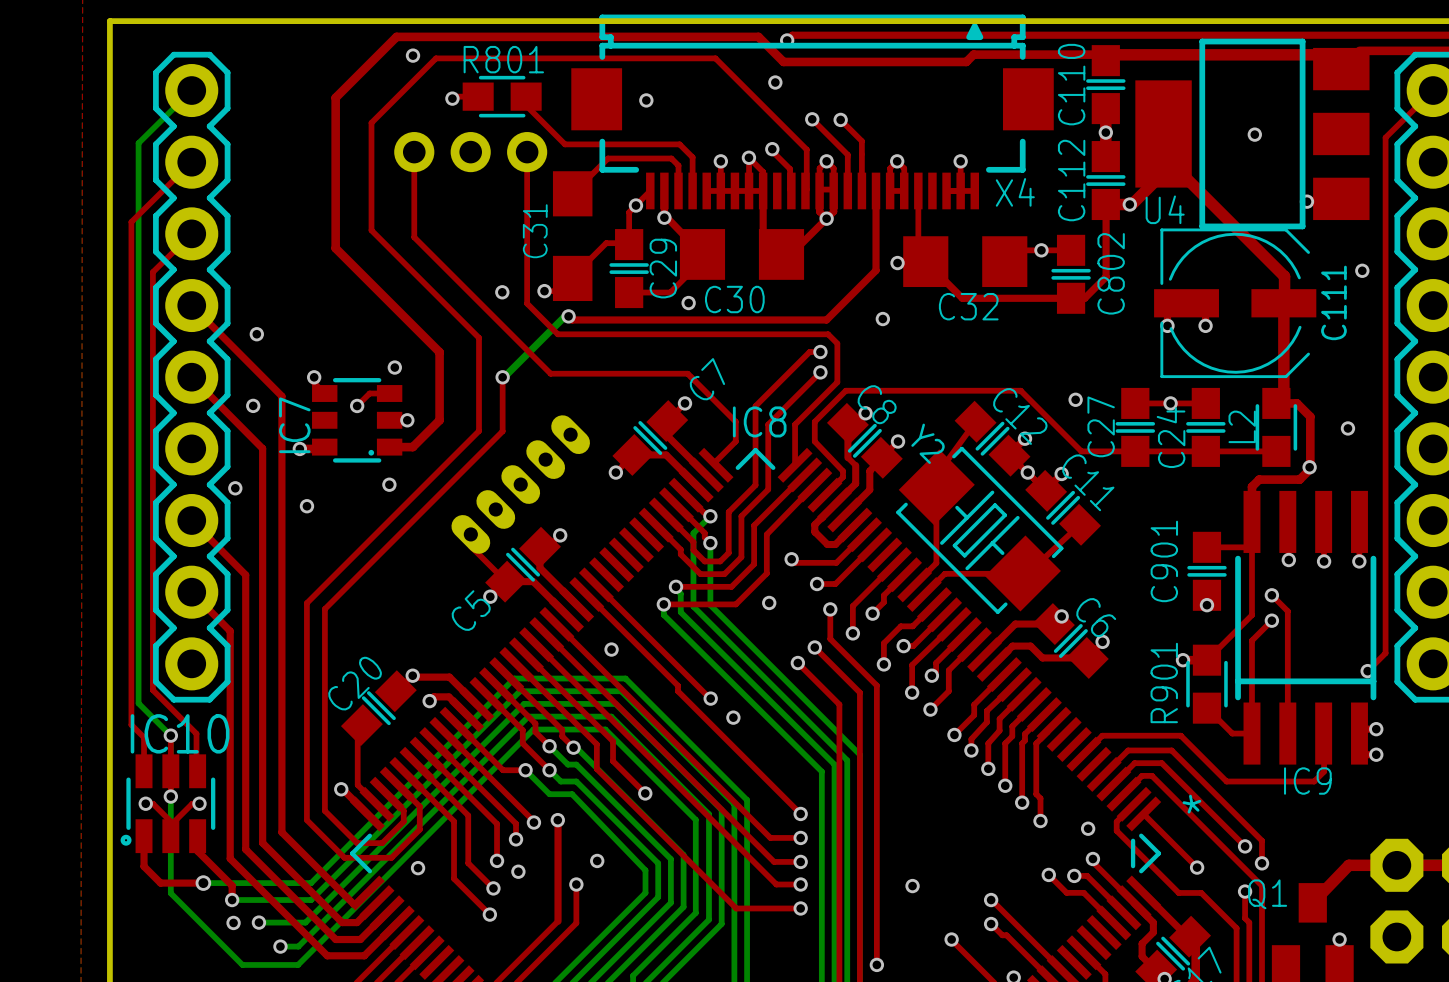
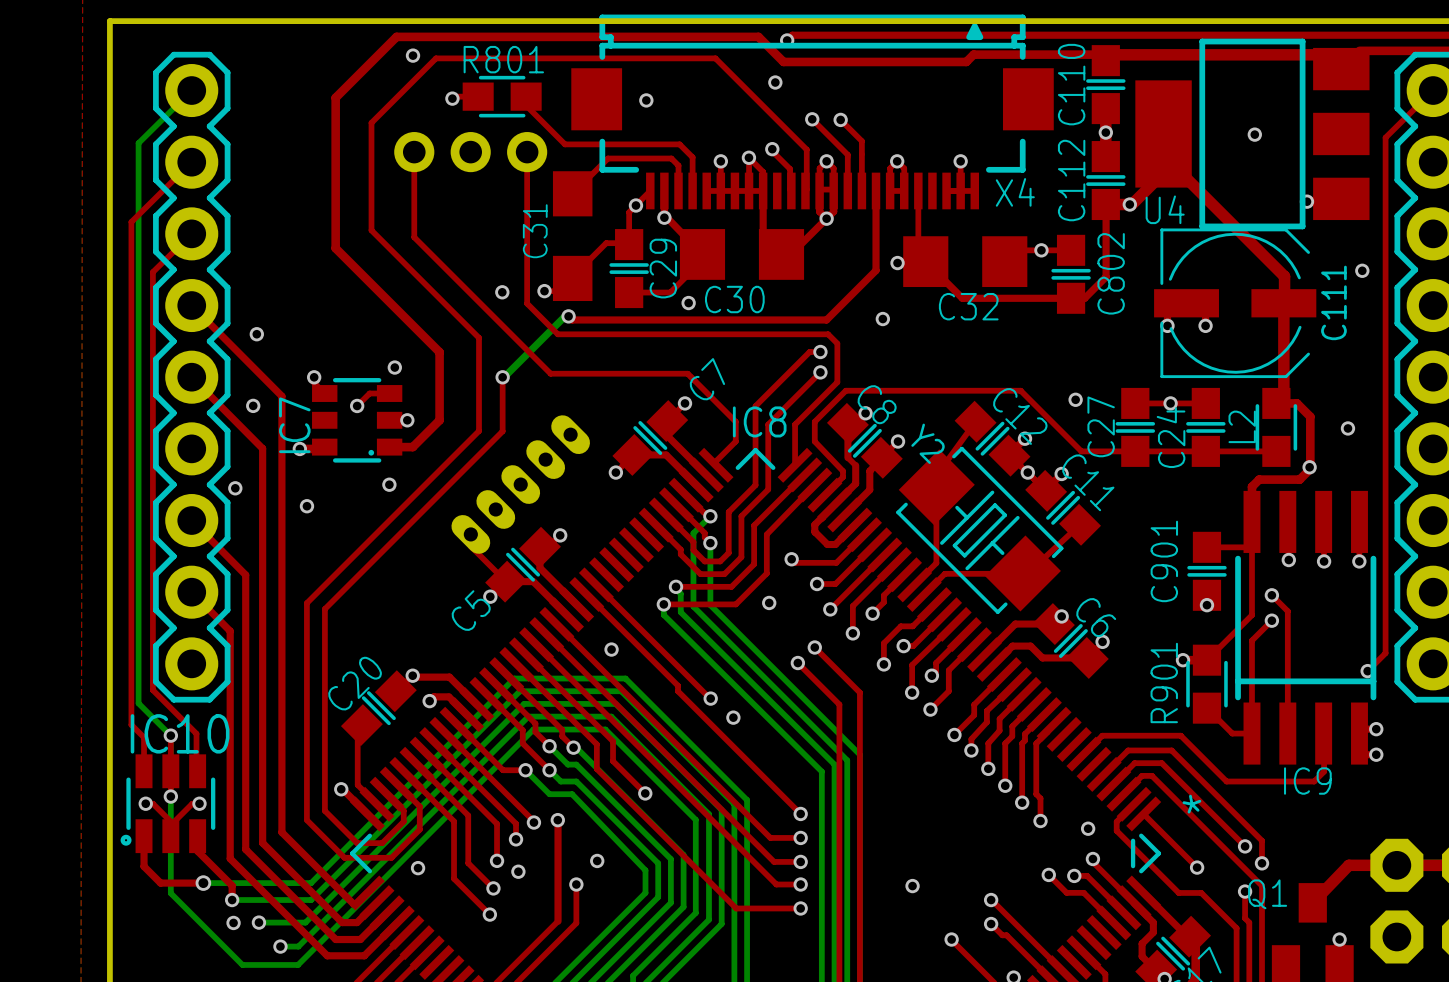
top track: (830, 609) (830, 639) (876, 685) (876, 964) -> (830, 609) (884, 554)
via: (876, 964) -> none

